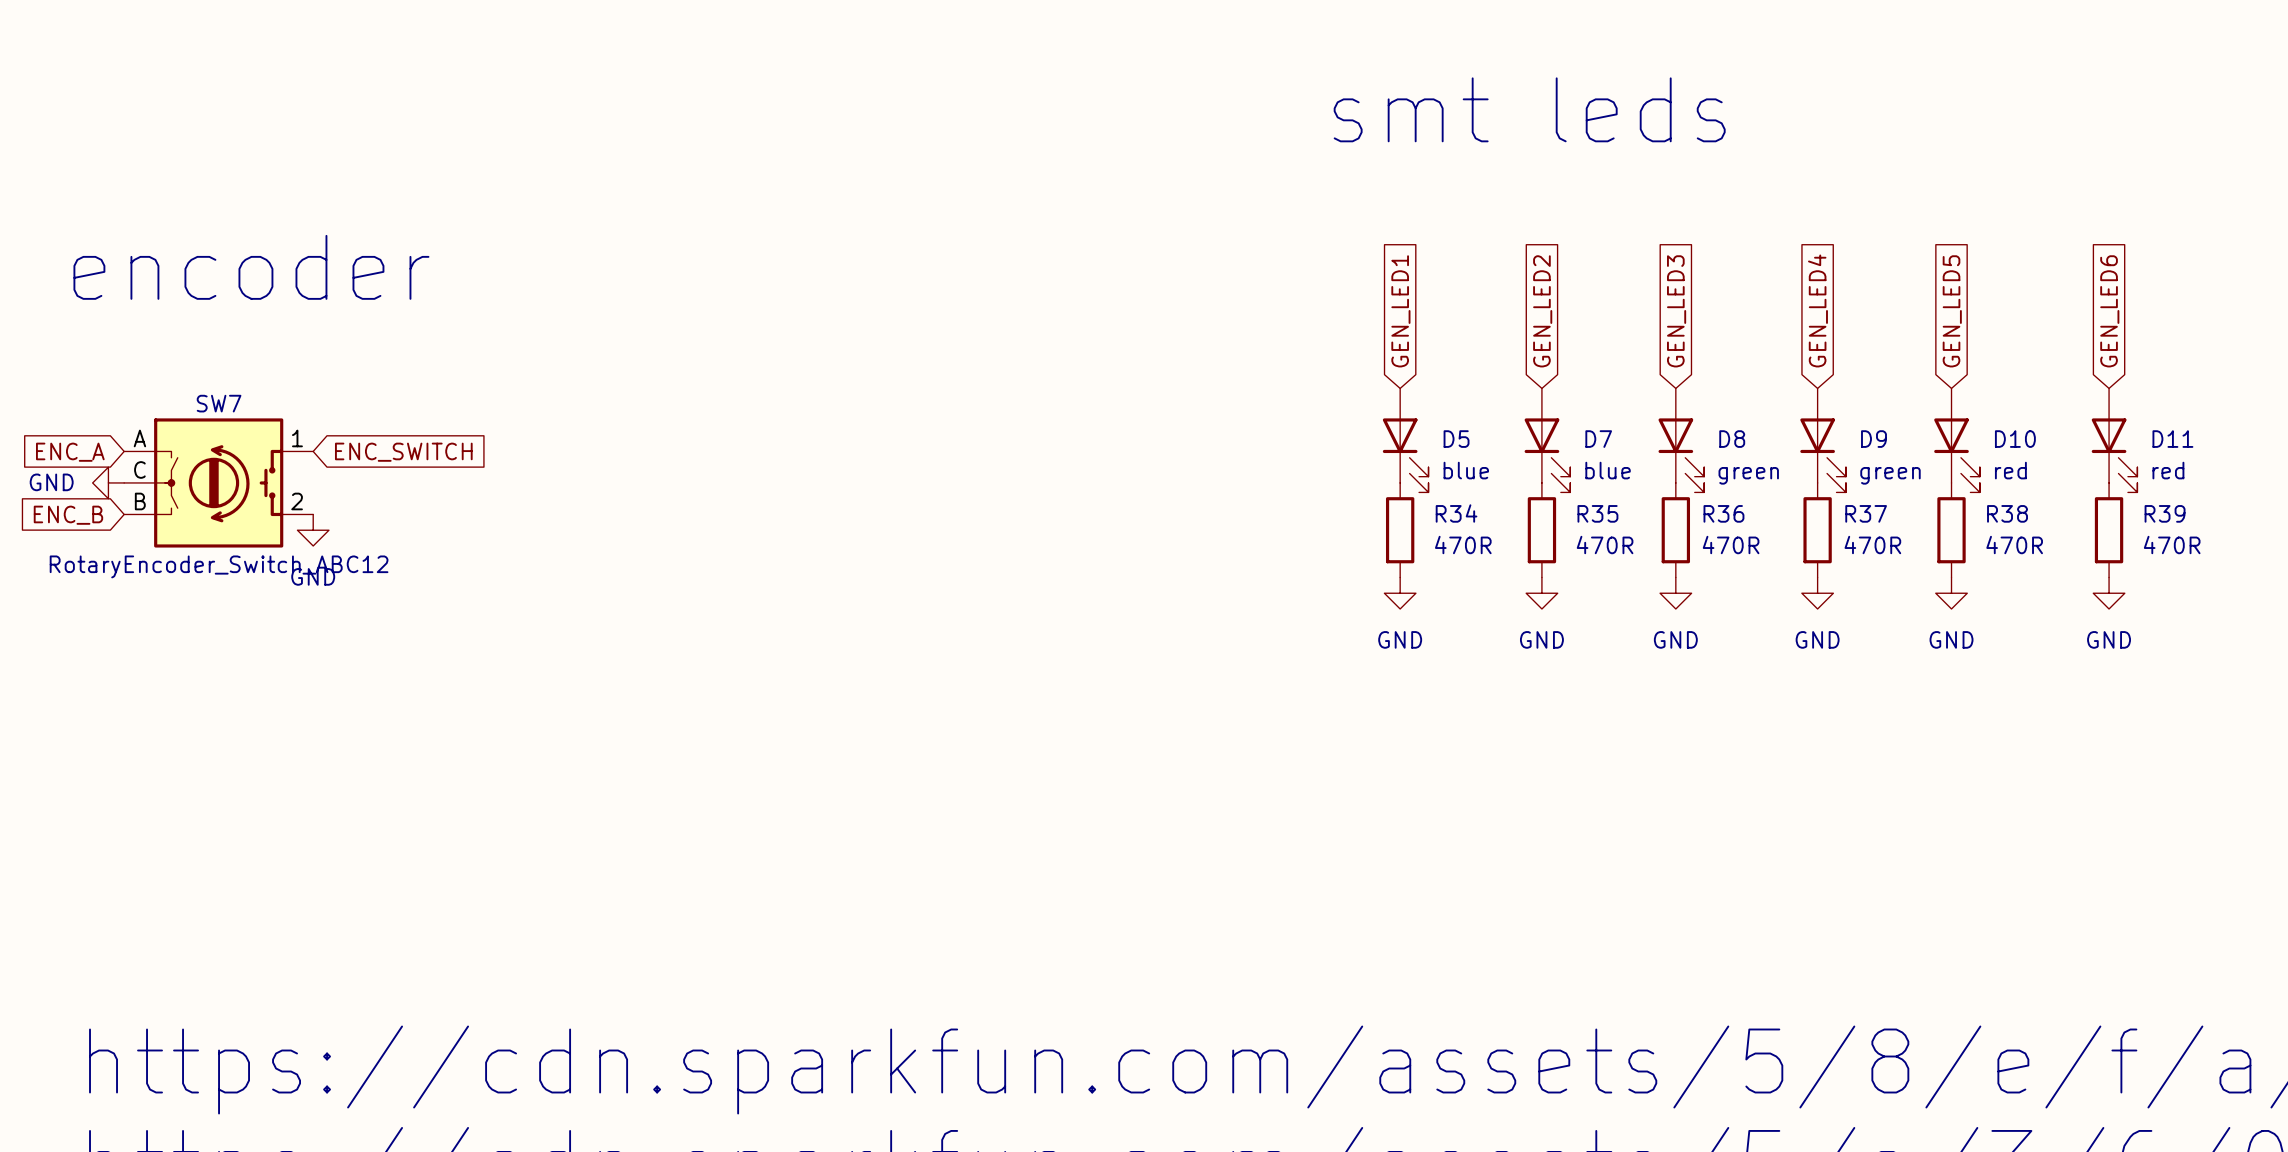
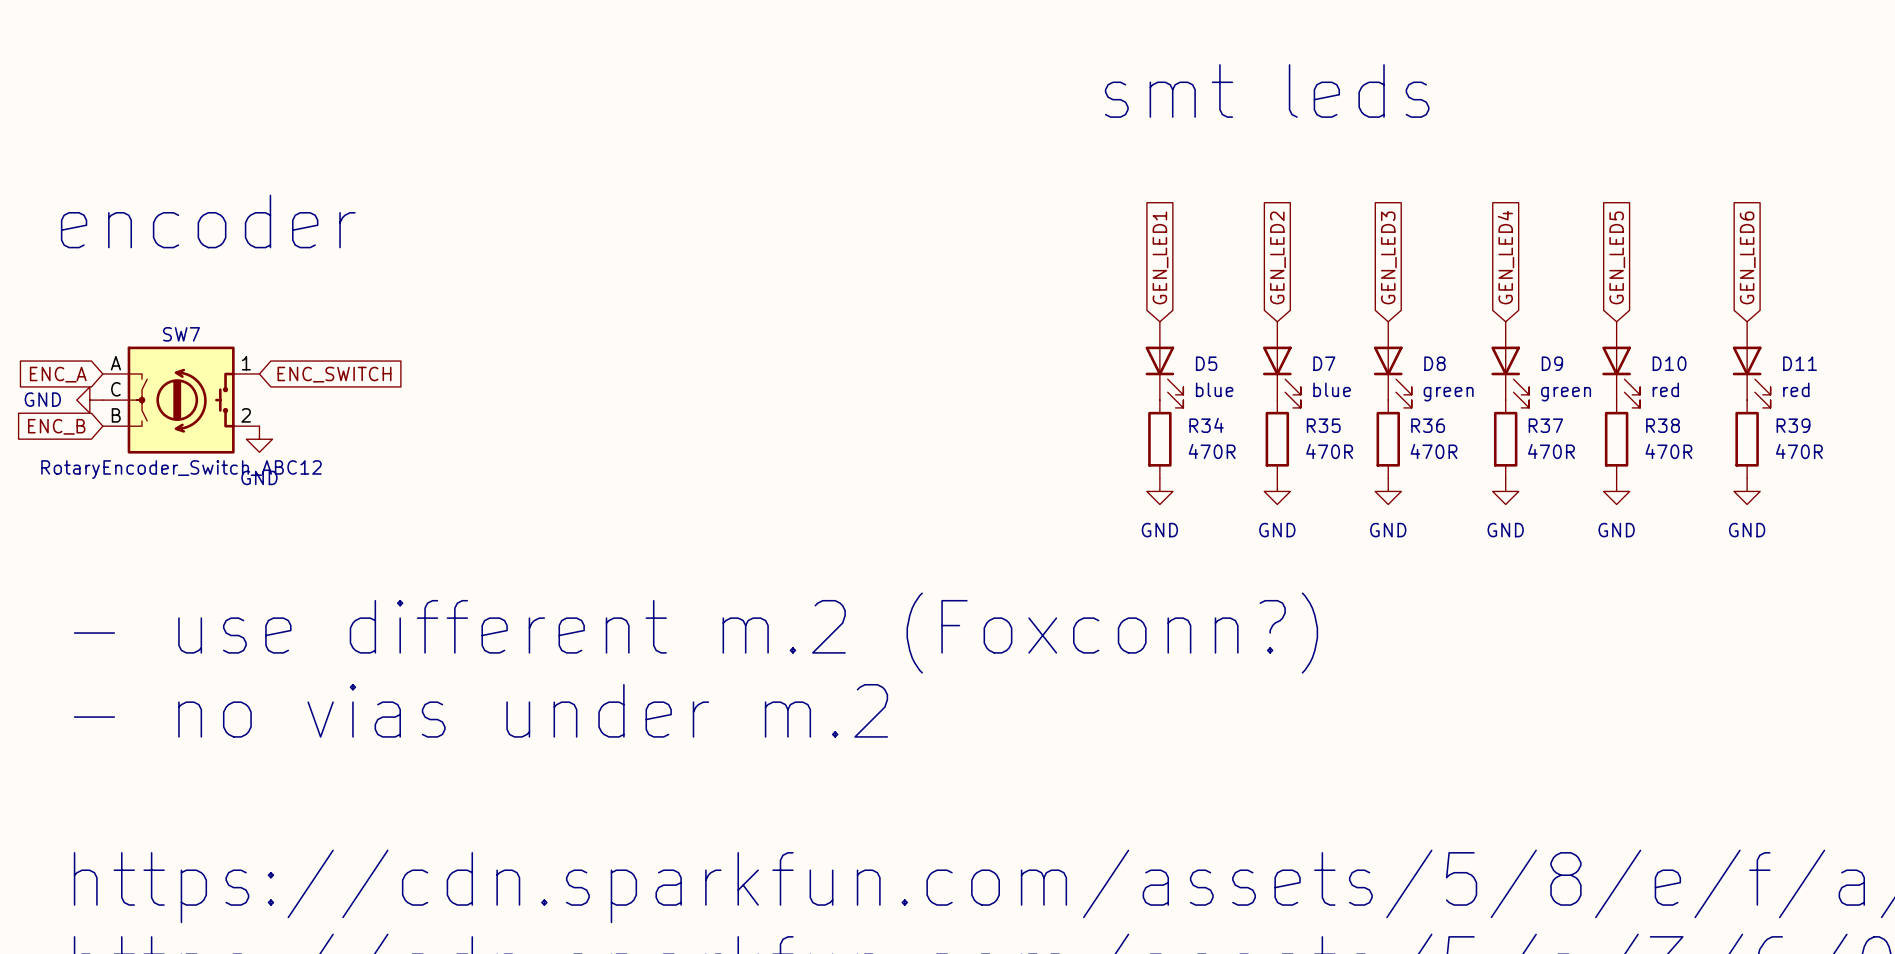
text: none -> - use different m.2 (Foxconn?) (695, 633)
text: none -> - no vias under m.2 (480, 710)

